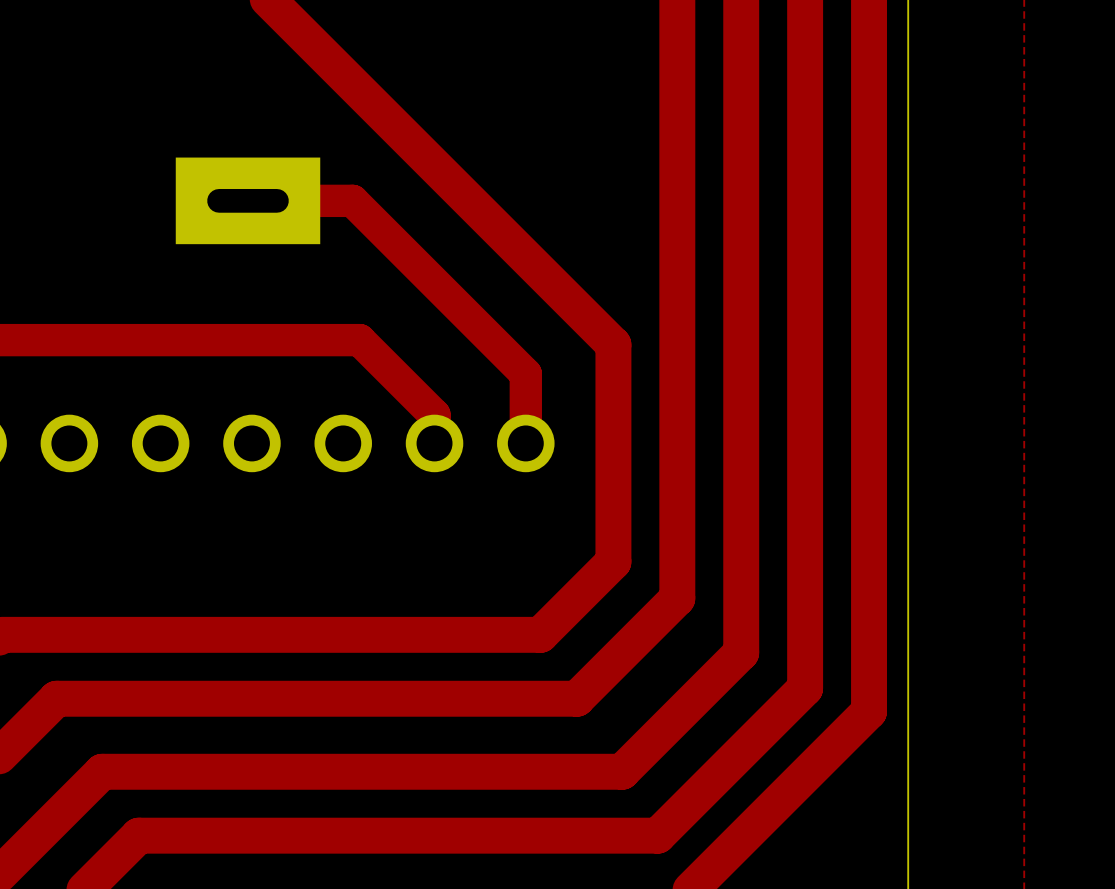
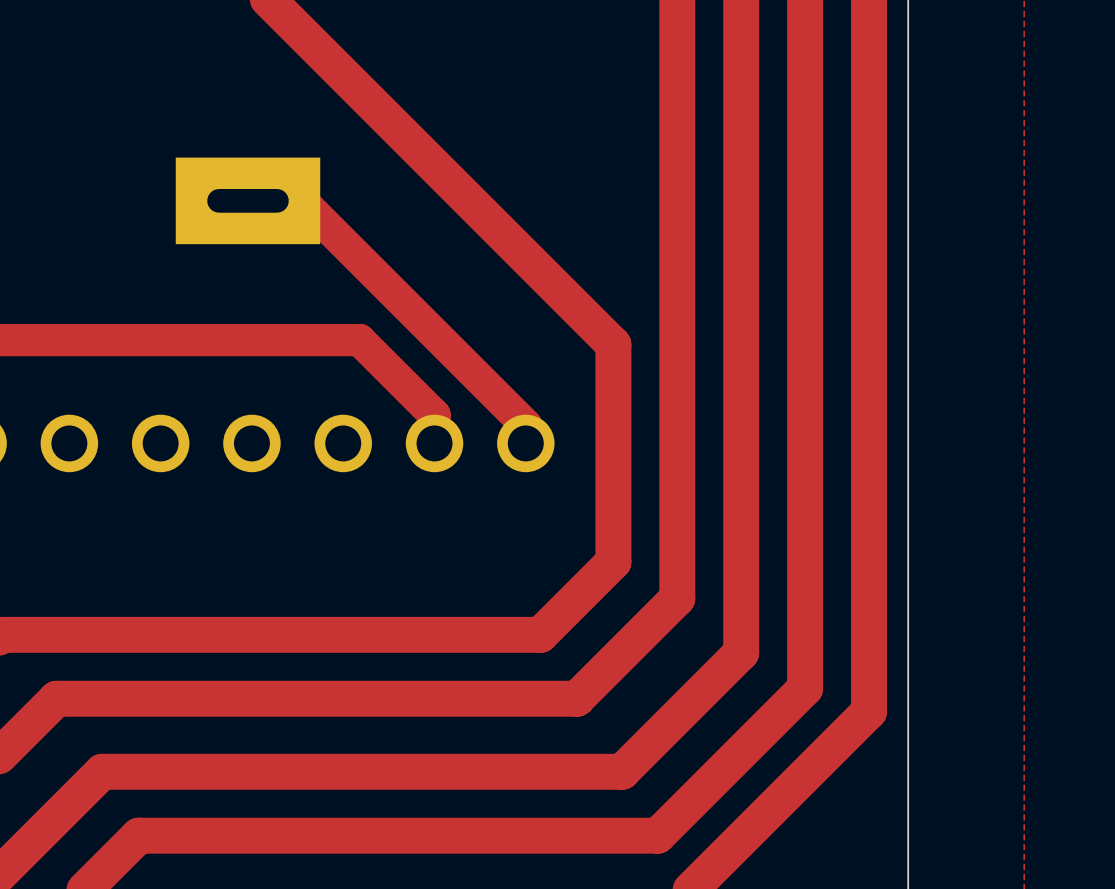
top track: (301, 200) (352, 200) (525, 374) (525, 424) -> (301, 200) (525, 424)

